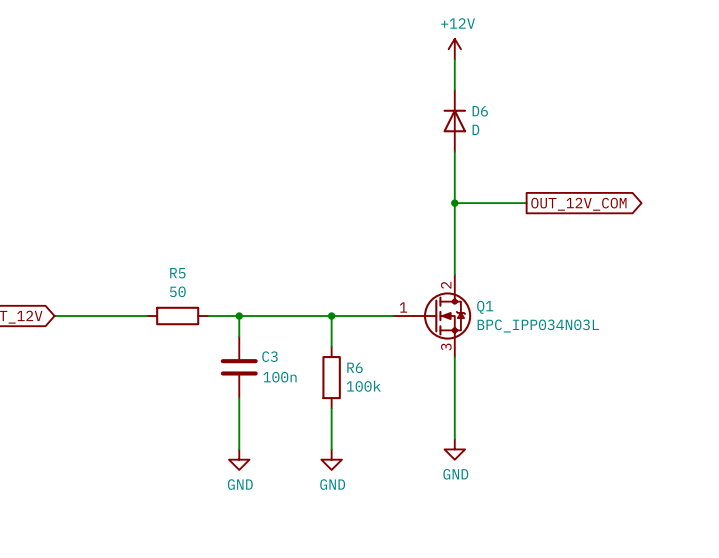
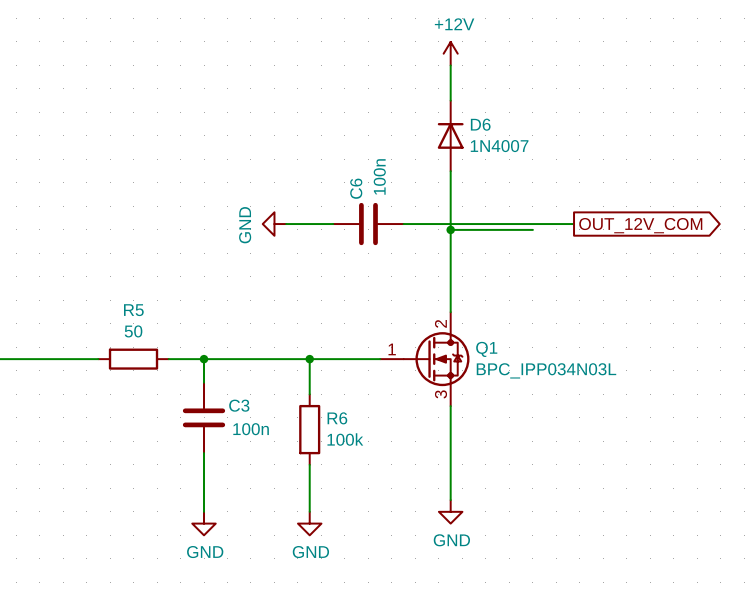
D6 value: D (475, 129) -> 1N4007 (499, 146)
power symbol: none -> GND (274, 224)
wire: none -> (286, 224) (333, 224)
C6: none -> 100n (368, 224)
wire: none -> (403, 224) (574, 224)
global label position: OUT_12V_COM (578, 204) -> OUT_12V_COM (640, 225)

